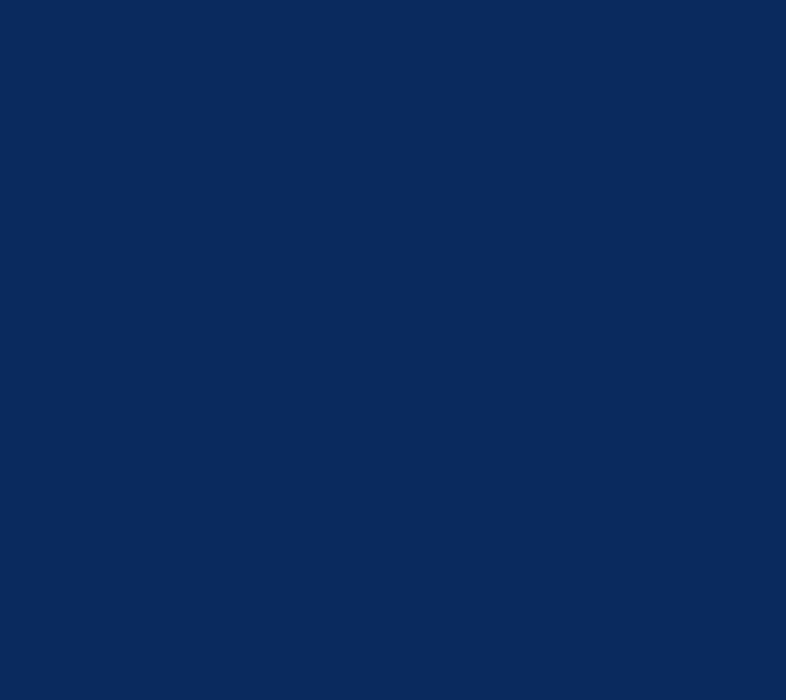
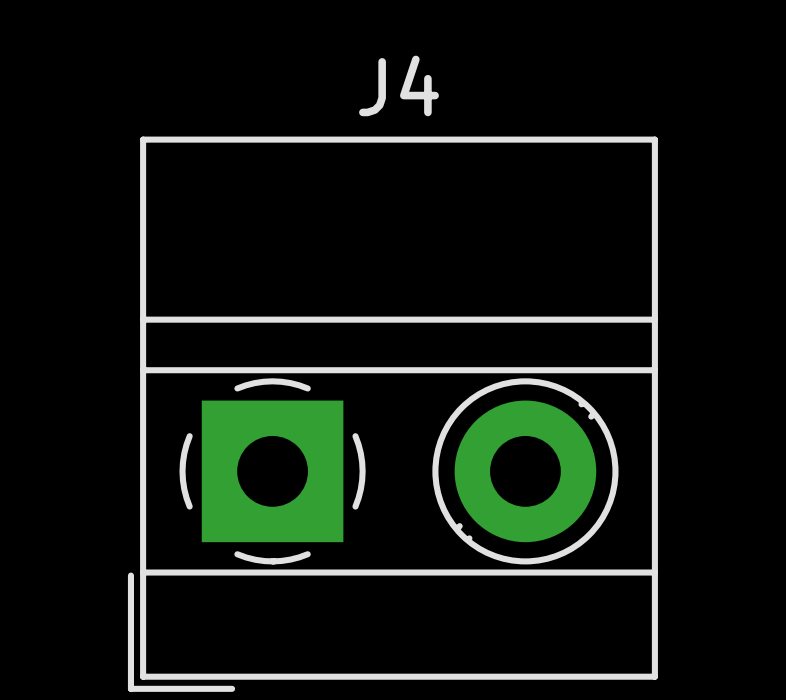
J4: none -> (392, 414)

